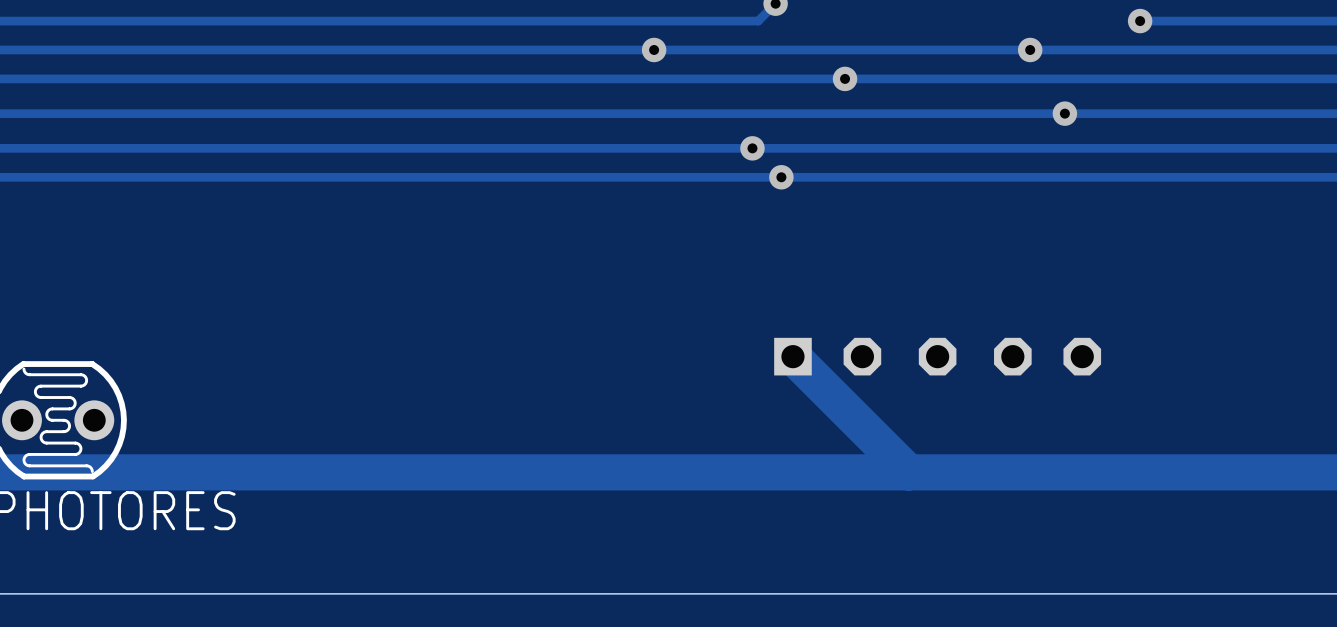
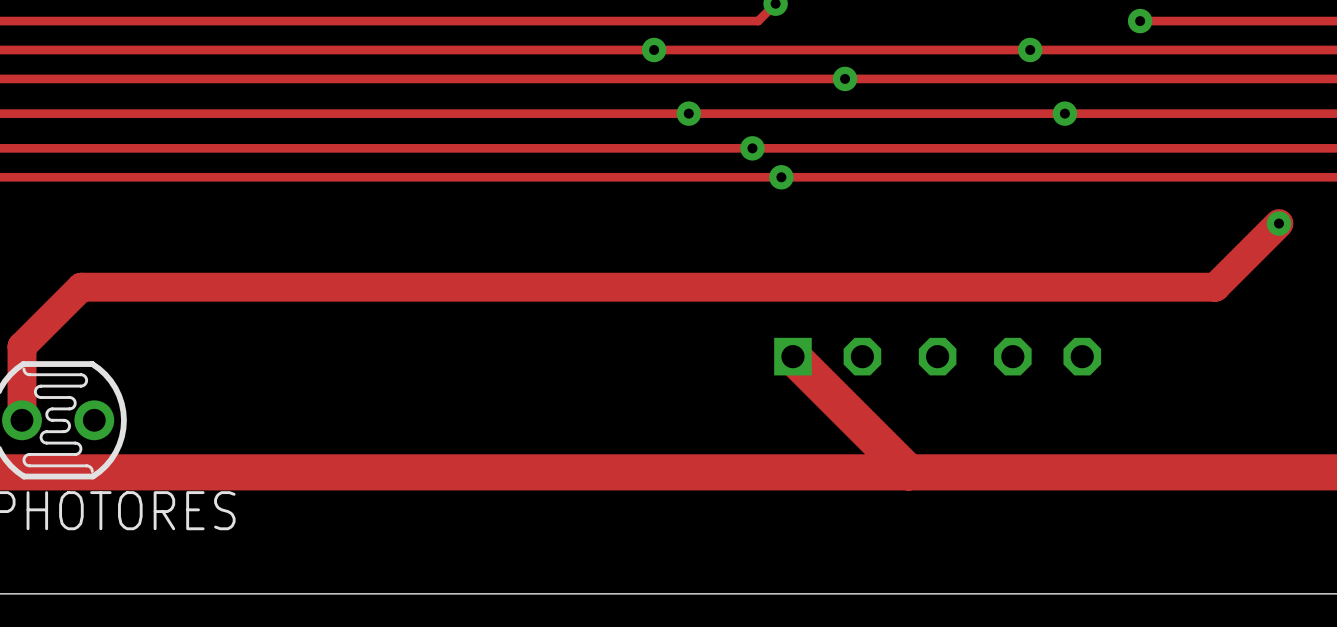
via: none -> (688, 113)
track: none -> (1278, 223) (1215, 287) (81, 287) (21, 346) (21, 420)
via: none -> (1278, 223)

